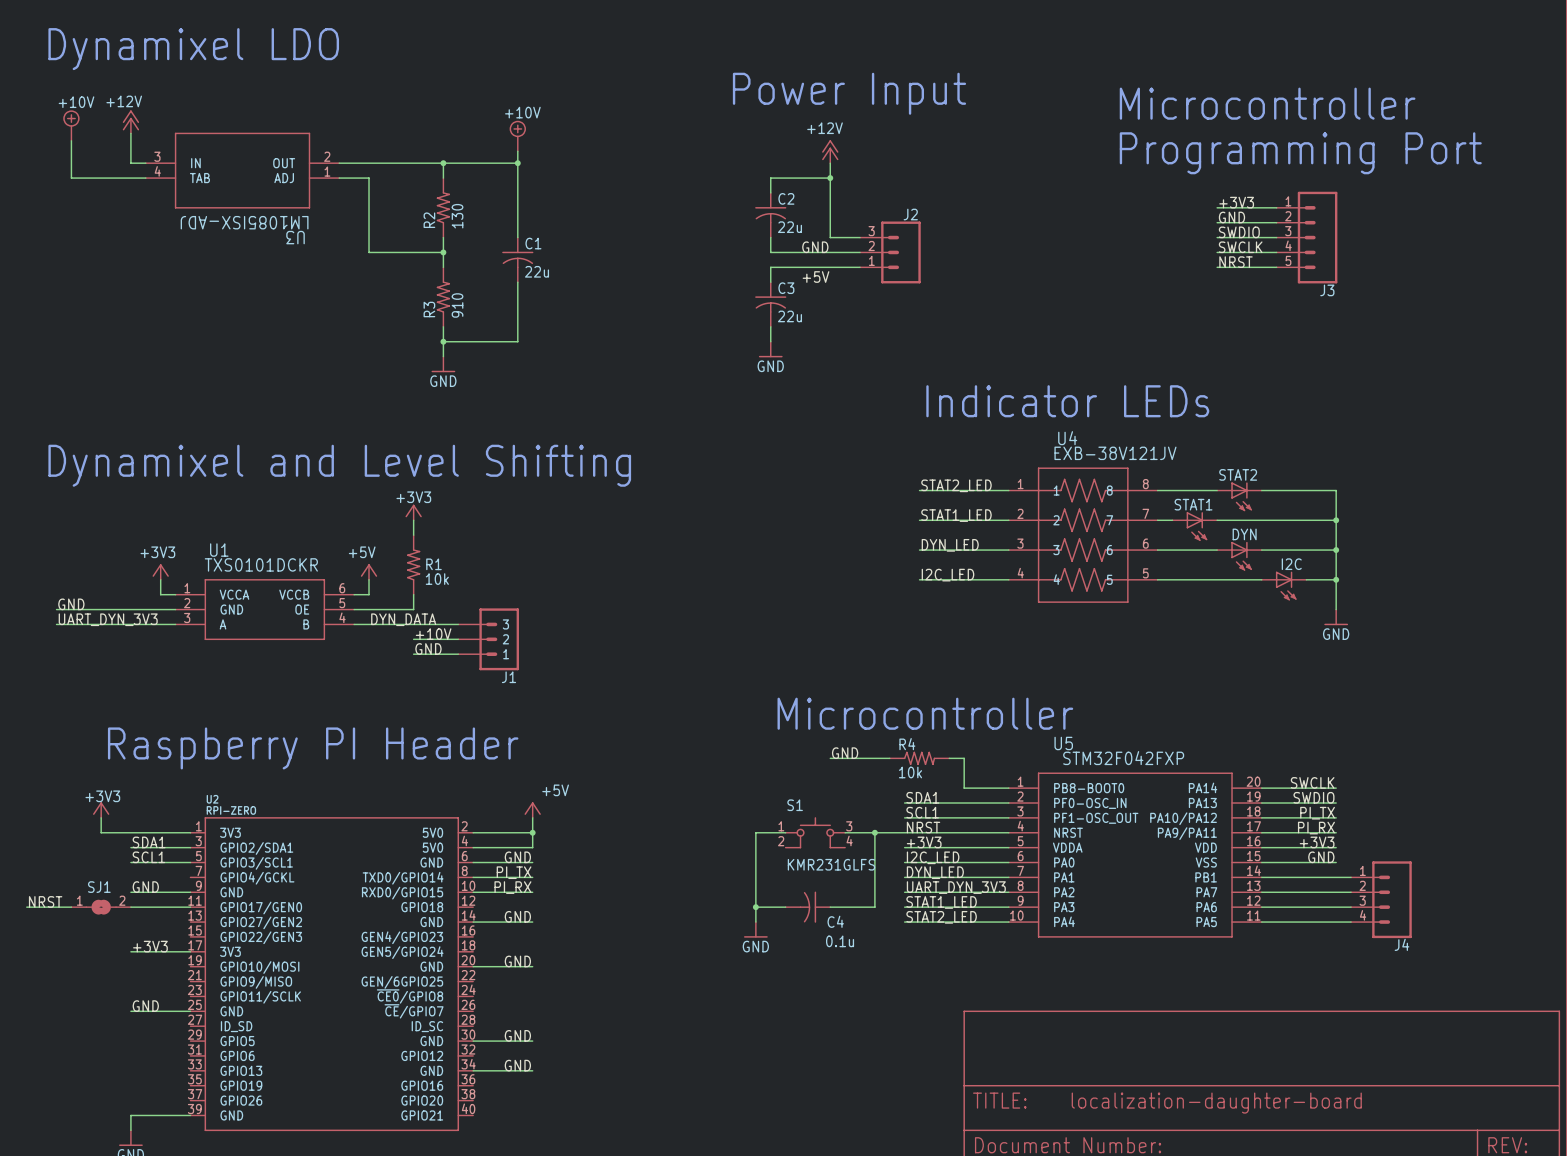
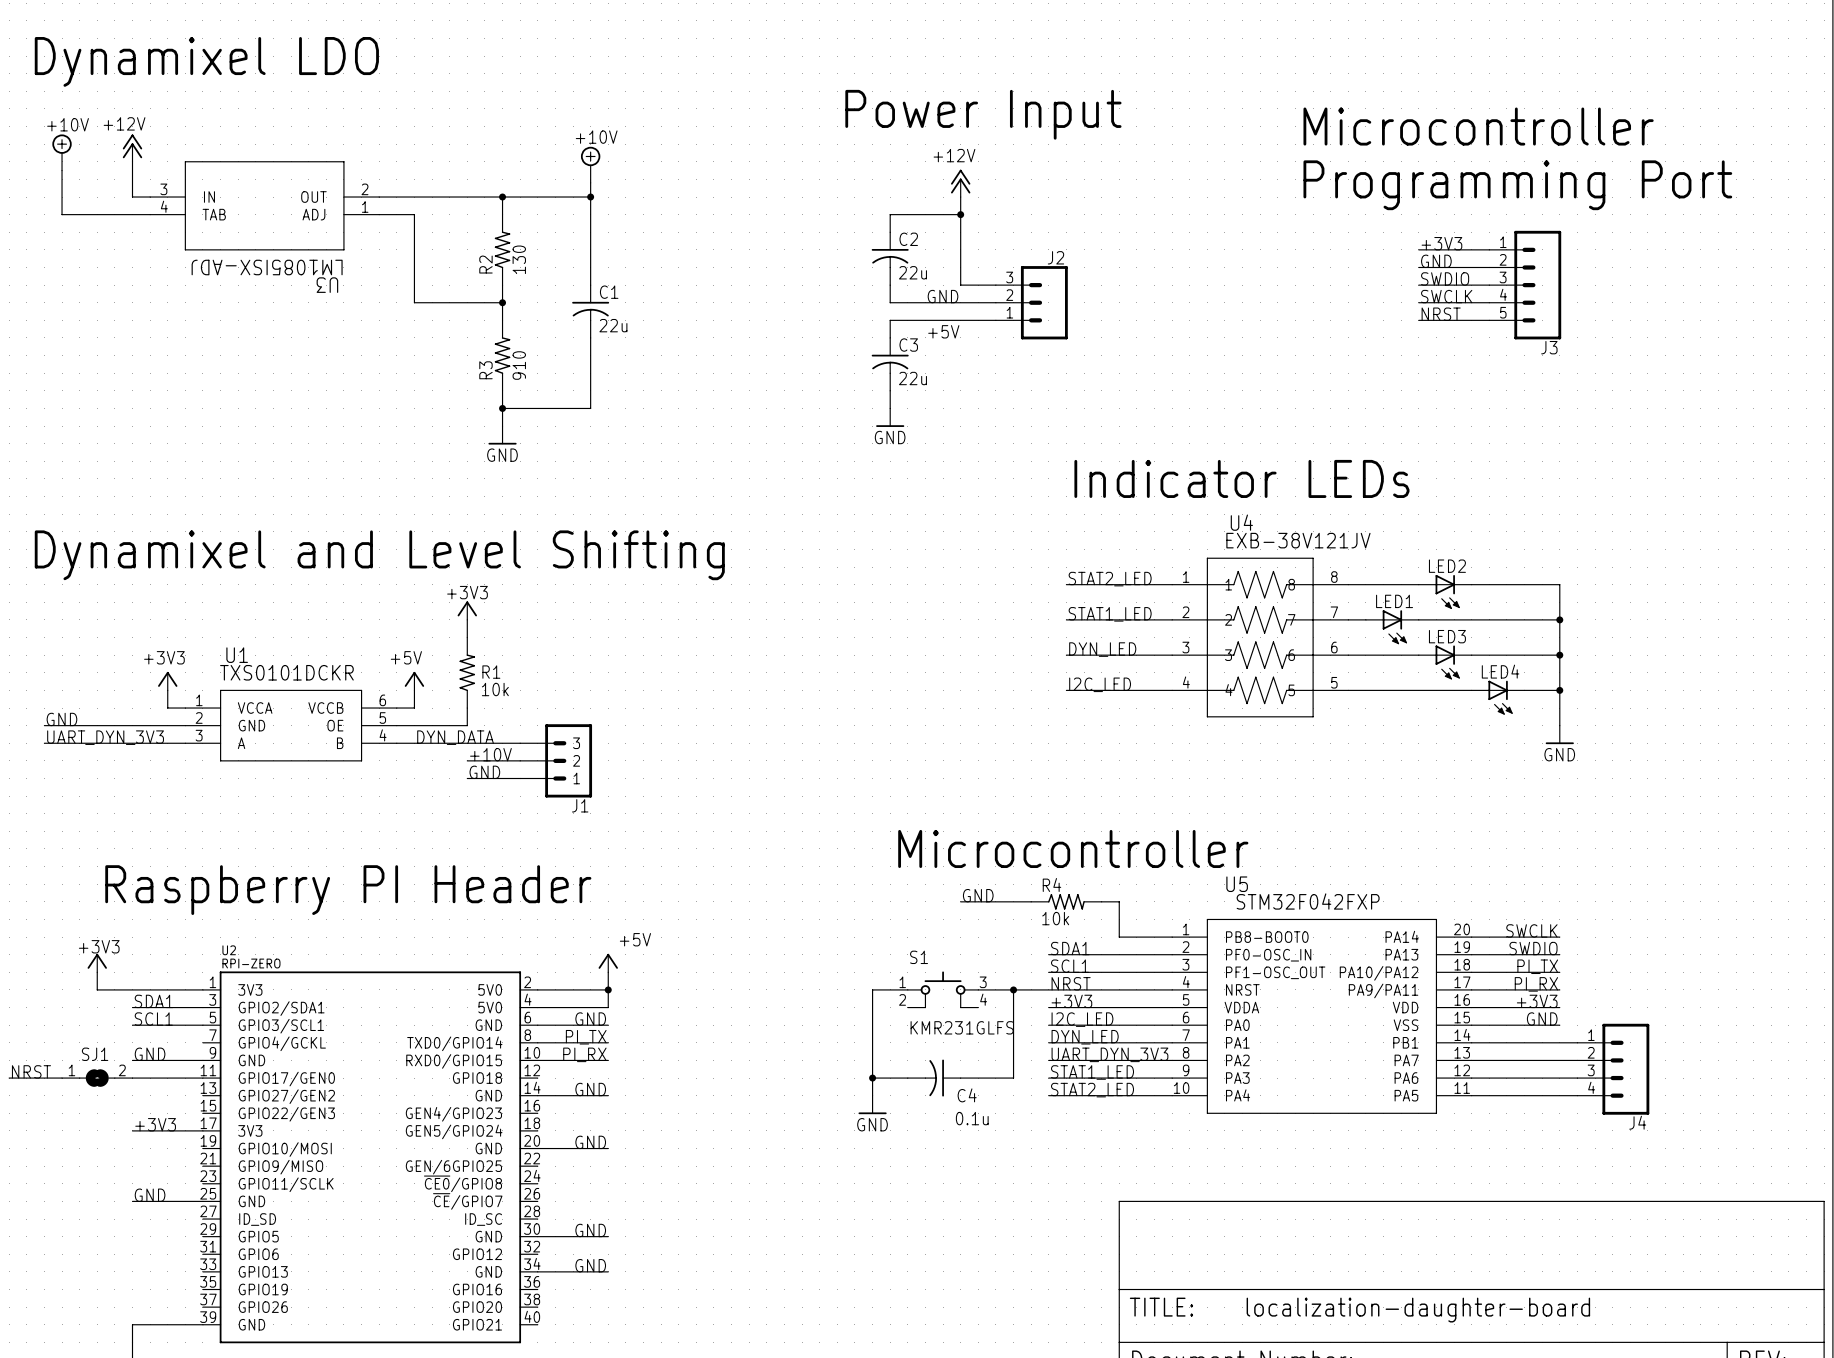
STAT2 name: STAT2 (1238, 474) -> LED2 (1447, 566)
STAT1 name: STAT1 (1193, 504) -> LED1 (1394, 601)
DYN name: DYN (1244, 534) -> LED3 (1447, 636)
I2C name: I2C (1291, 564) -> LED4 (1500, 671)

